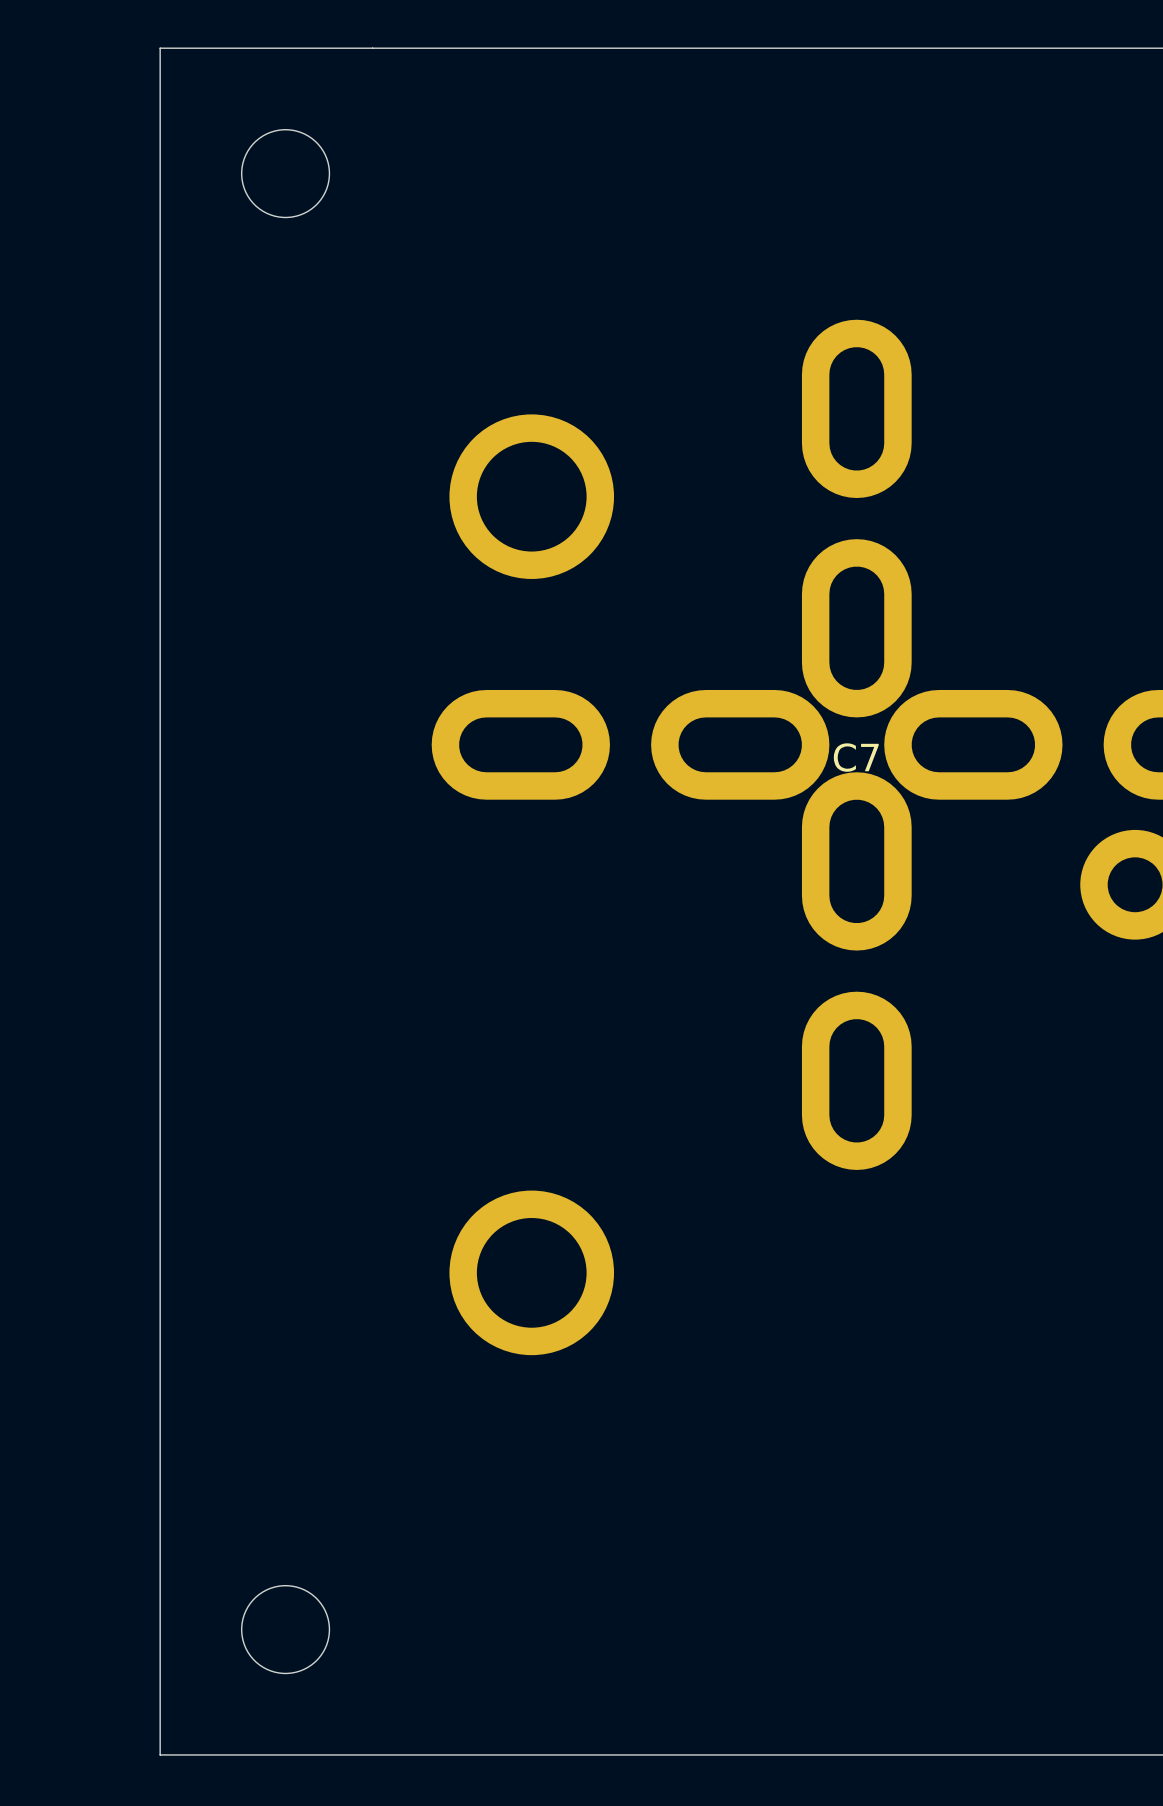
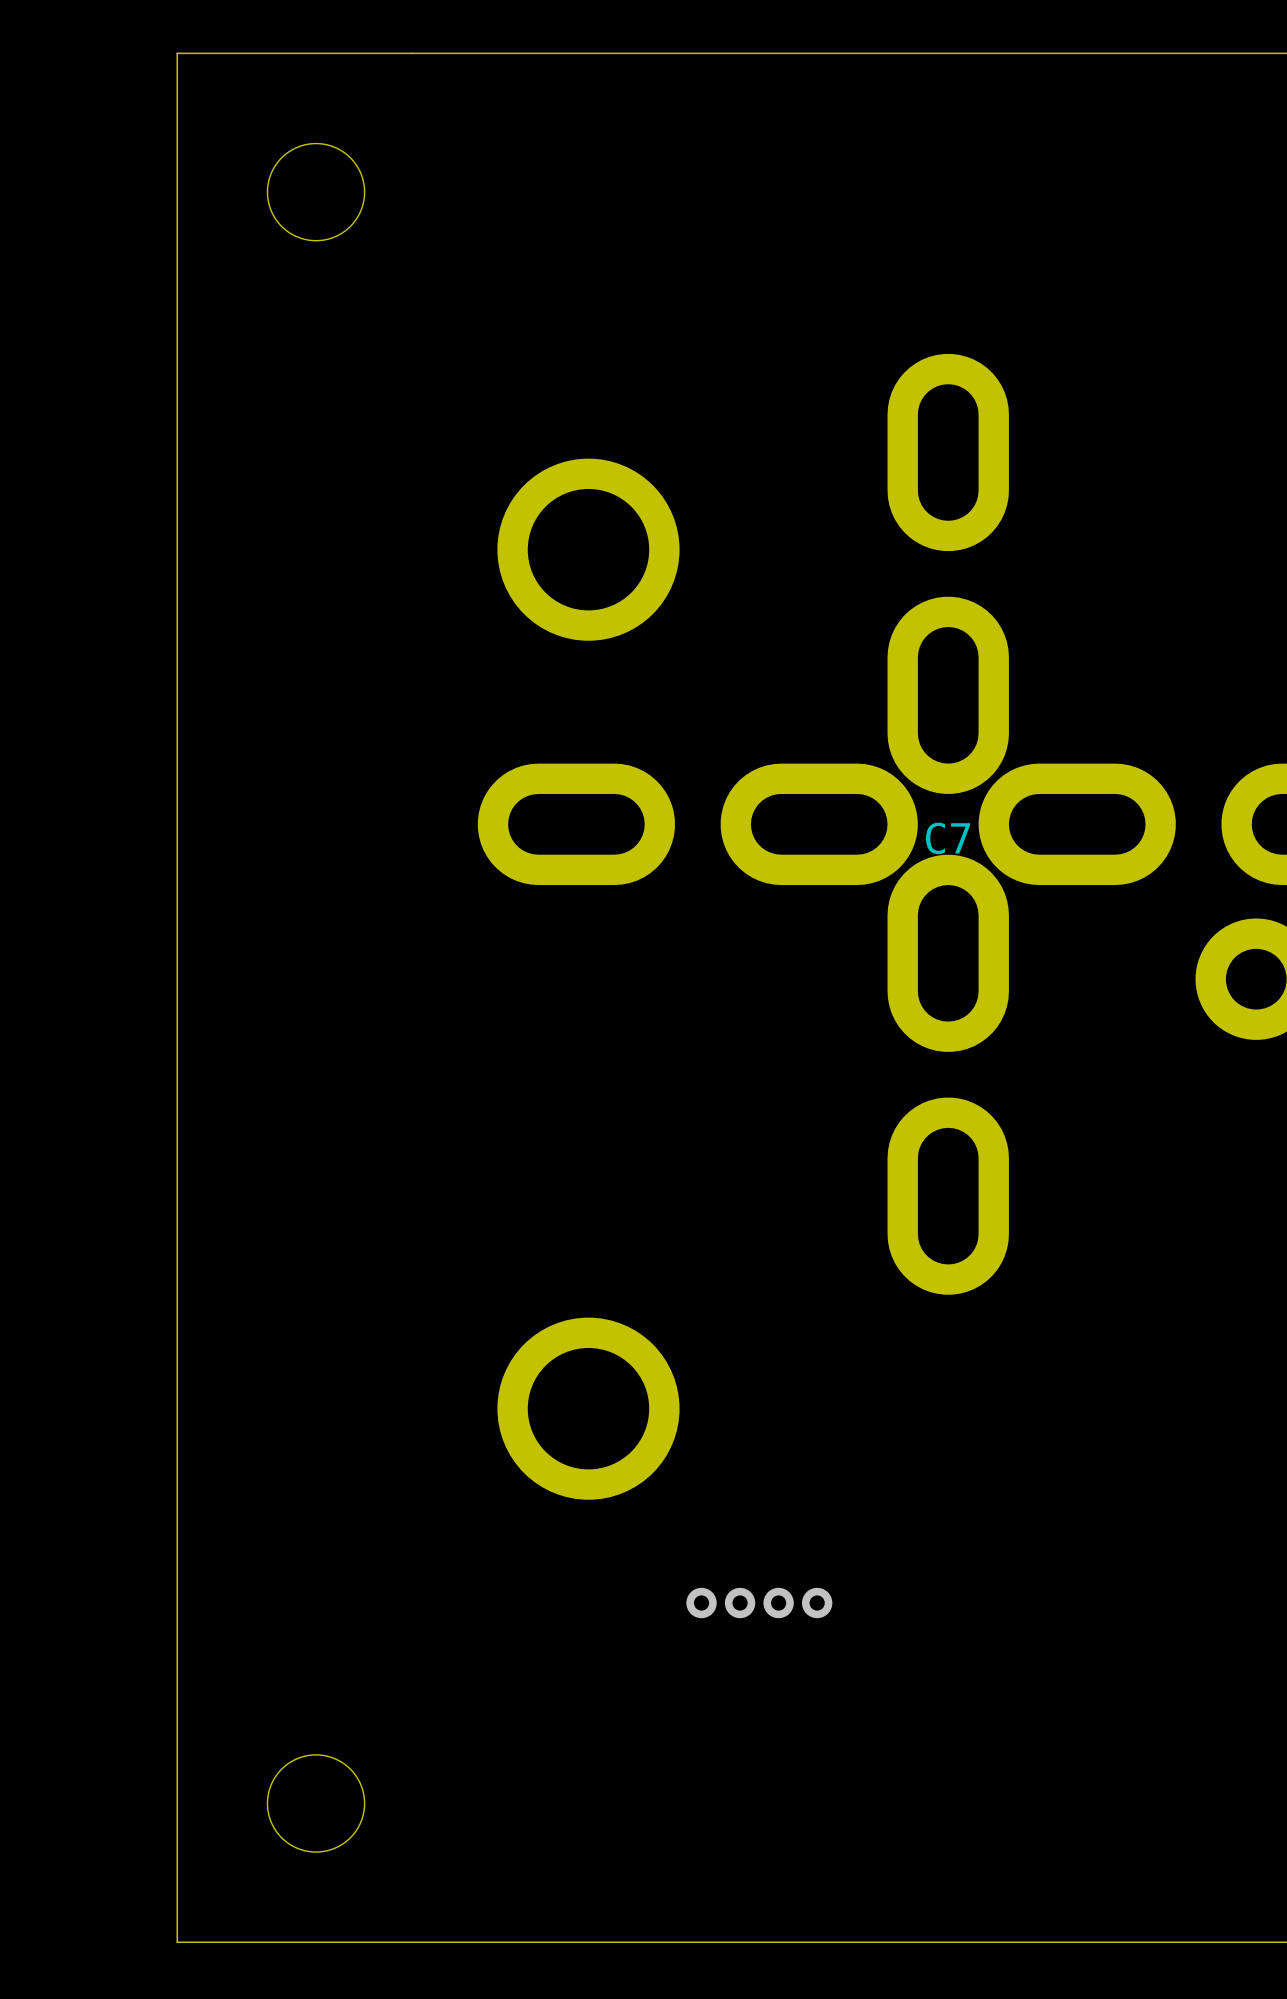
via: none -> (701, 1603)
via: none -> (740, 1603)
via: none -> (778, 1603)
via: none -> (817, 1603)

